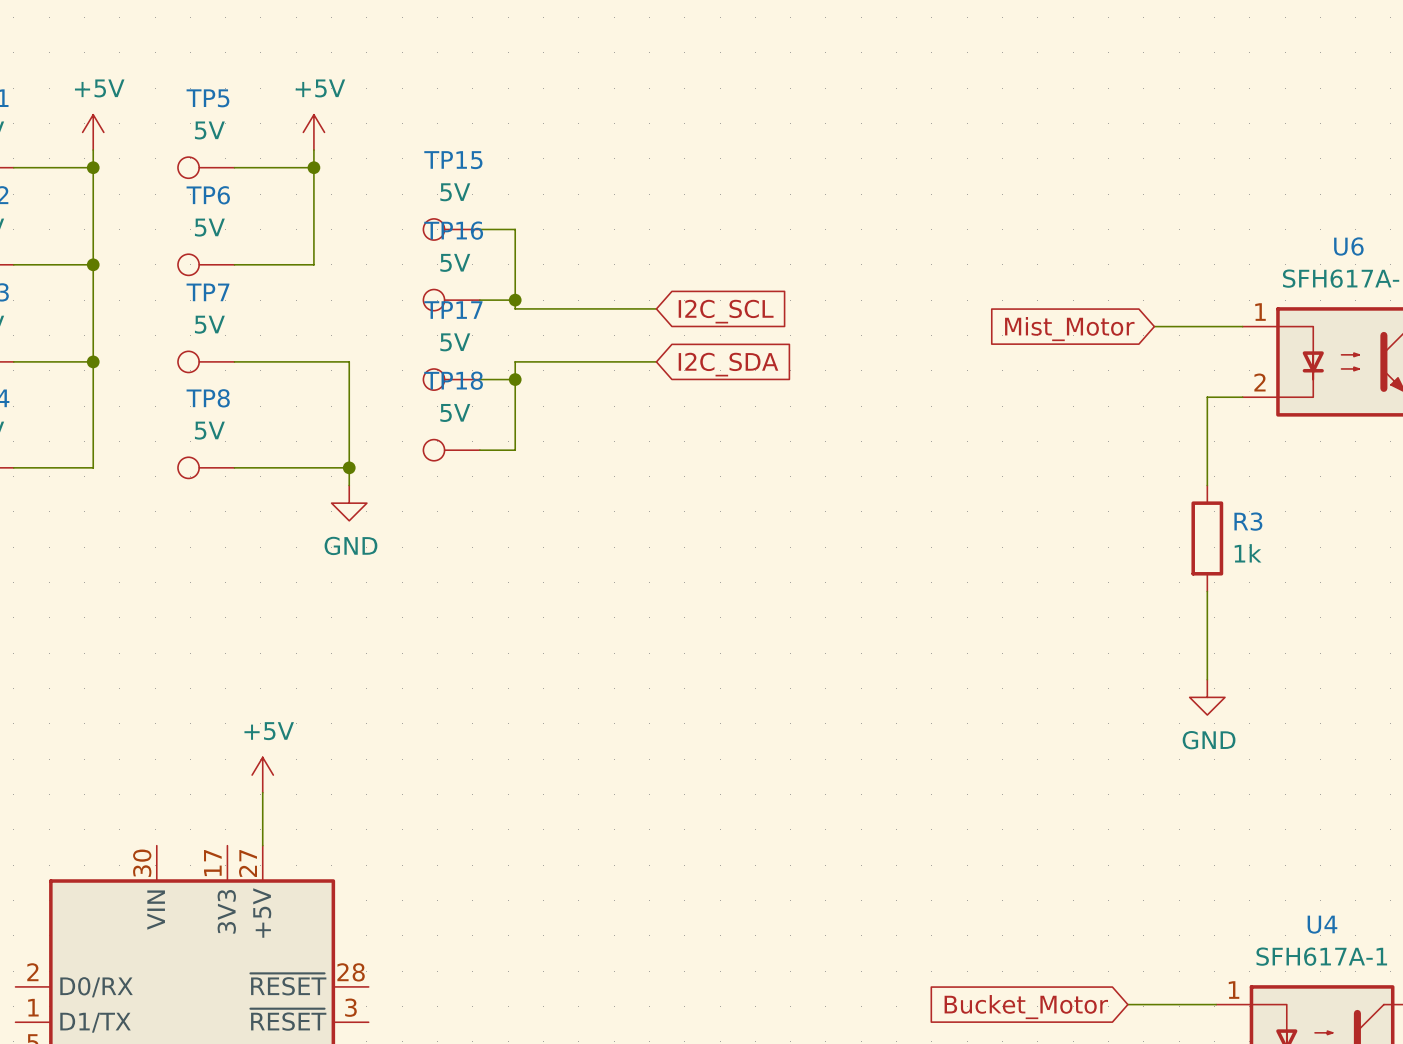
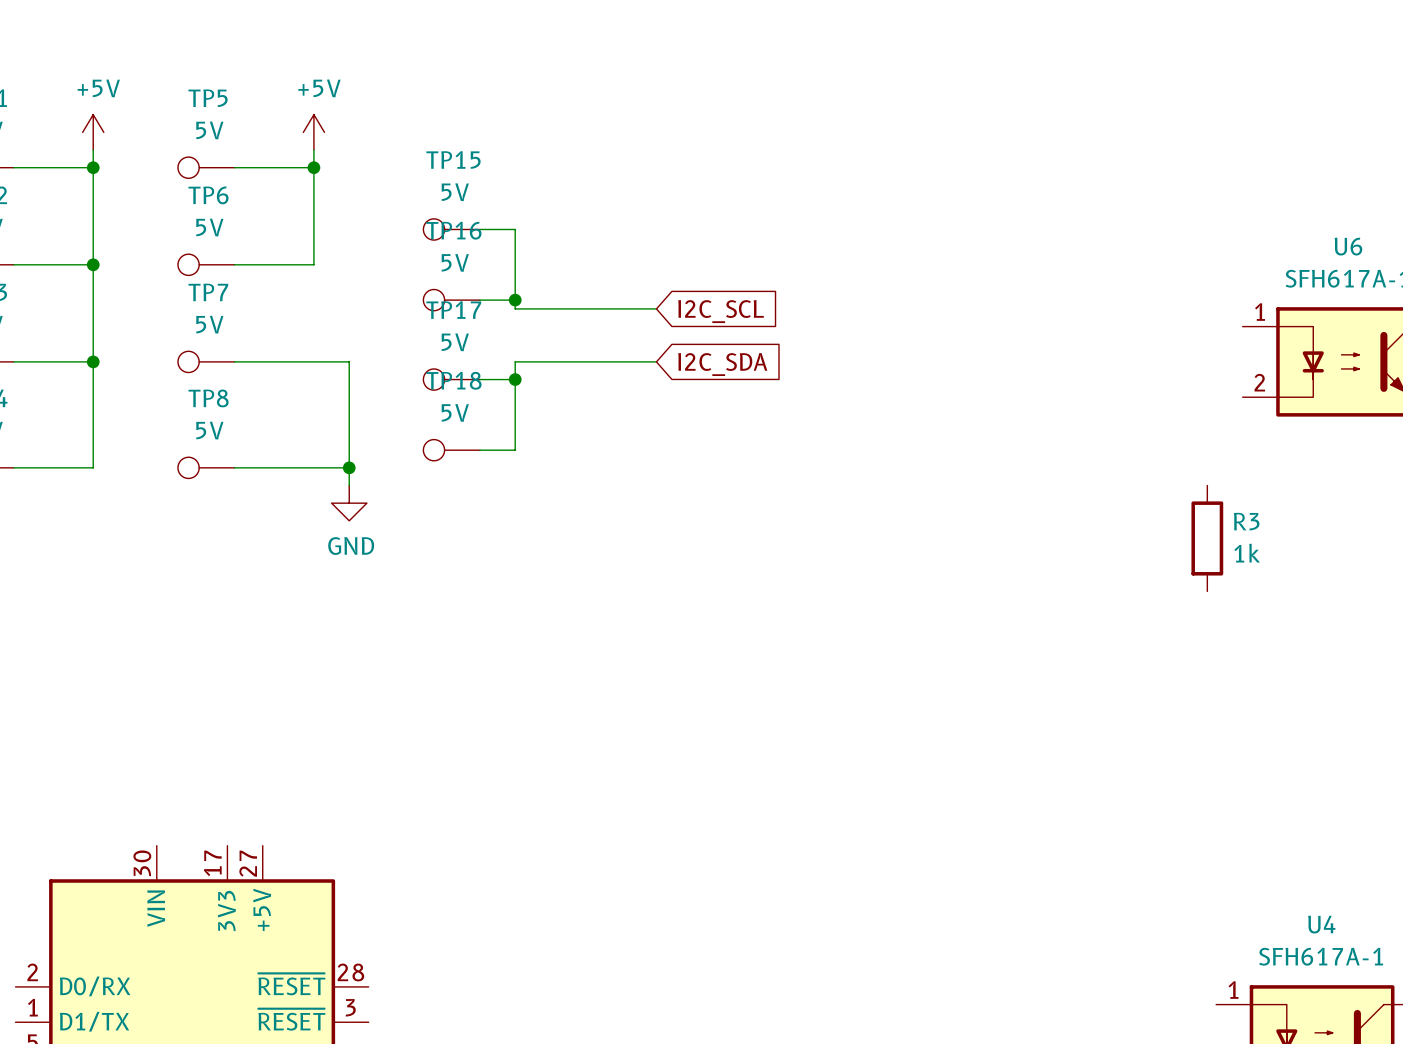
wire: (1154, 326) (1242, 326) -> none
global label: Mist_Motor (1069, 329) -> none
wire: (1242, 397) (1207, 397) (1207, 485) -> none
wire: (1207, 591) (1207, 679) -> none
power symbol: GND (1207, 697) -> none
power symbol: +5V (262, 775) -> none
wire: (262, 792) (262, 845) -> none
wire: (1127, 1004) (1216, 1004) -> none
global label: Bucket_Motor (1026, 1007) -> none

